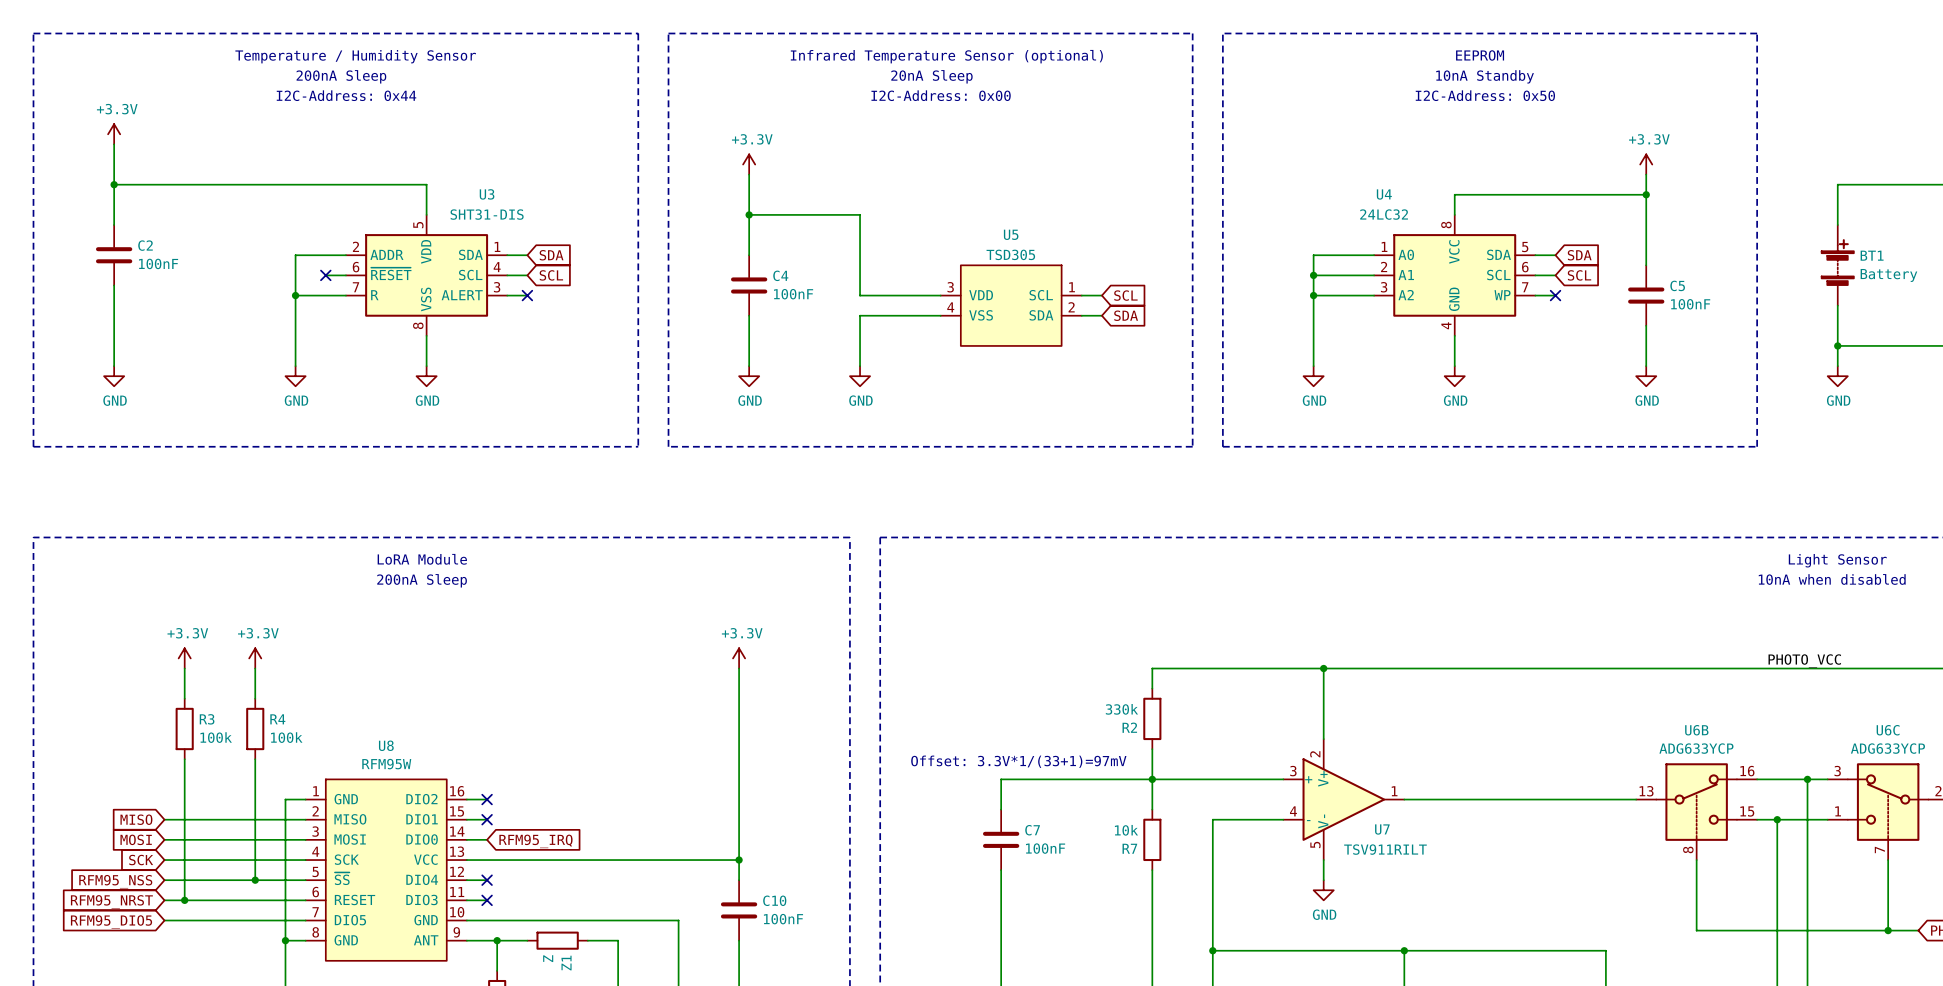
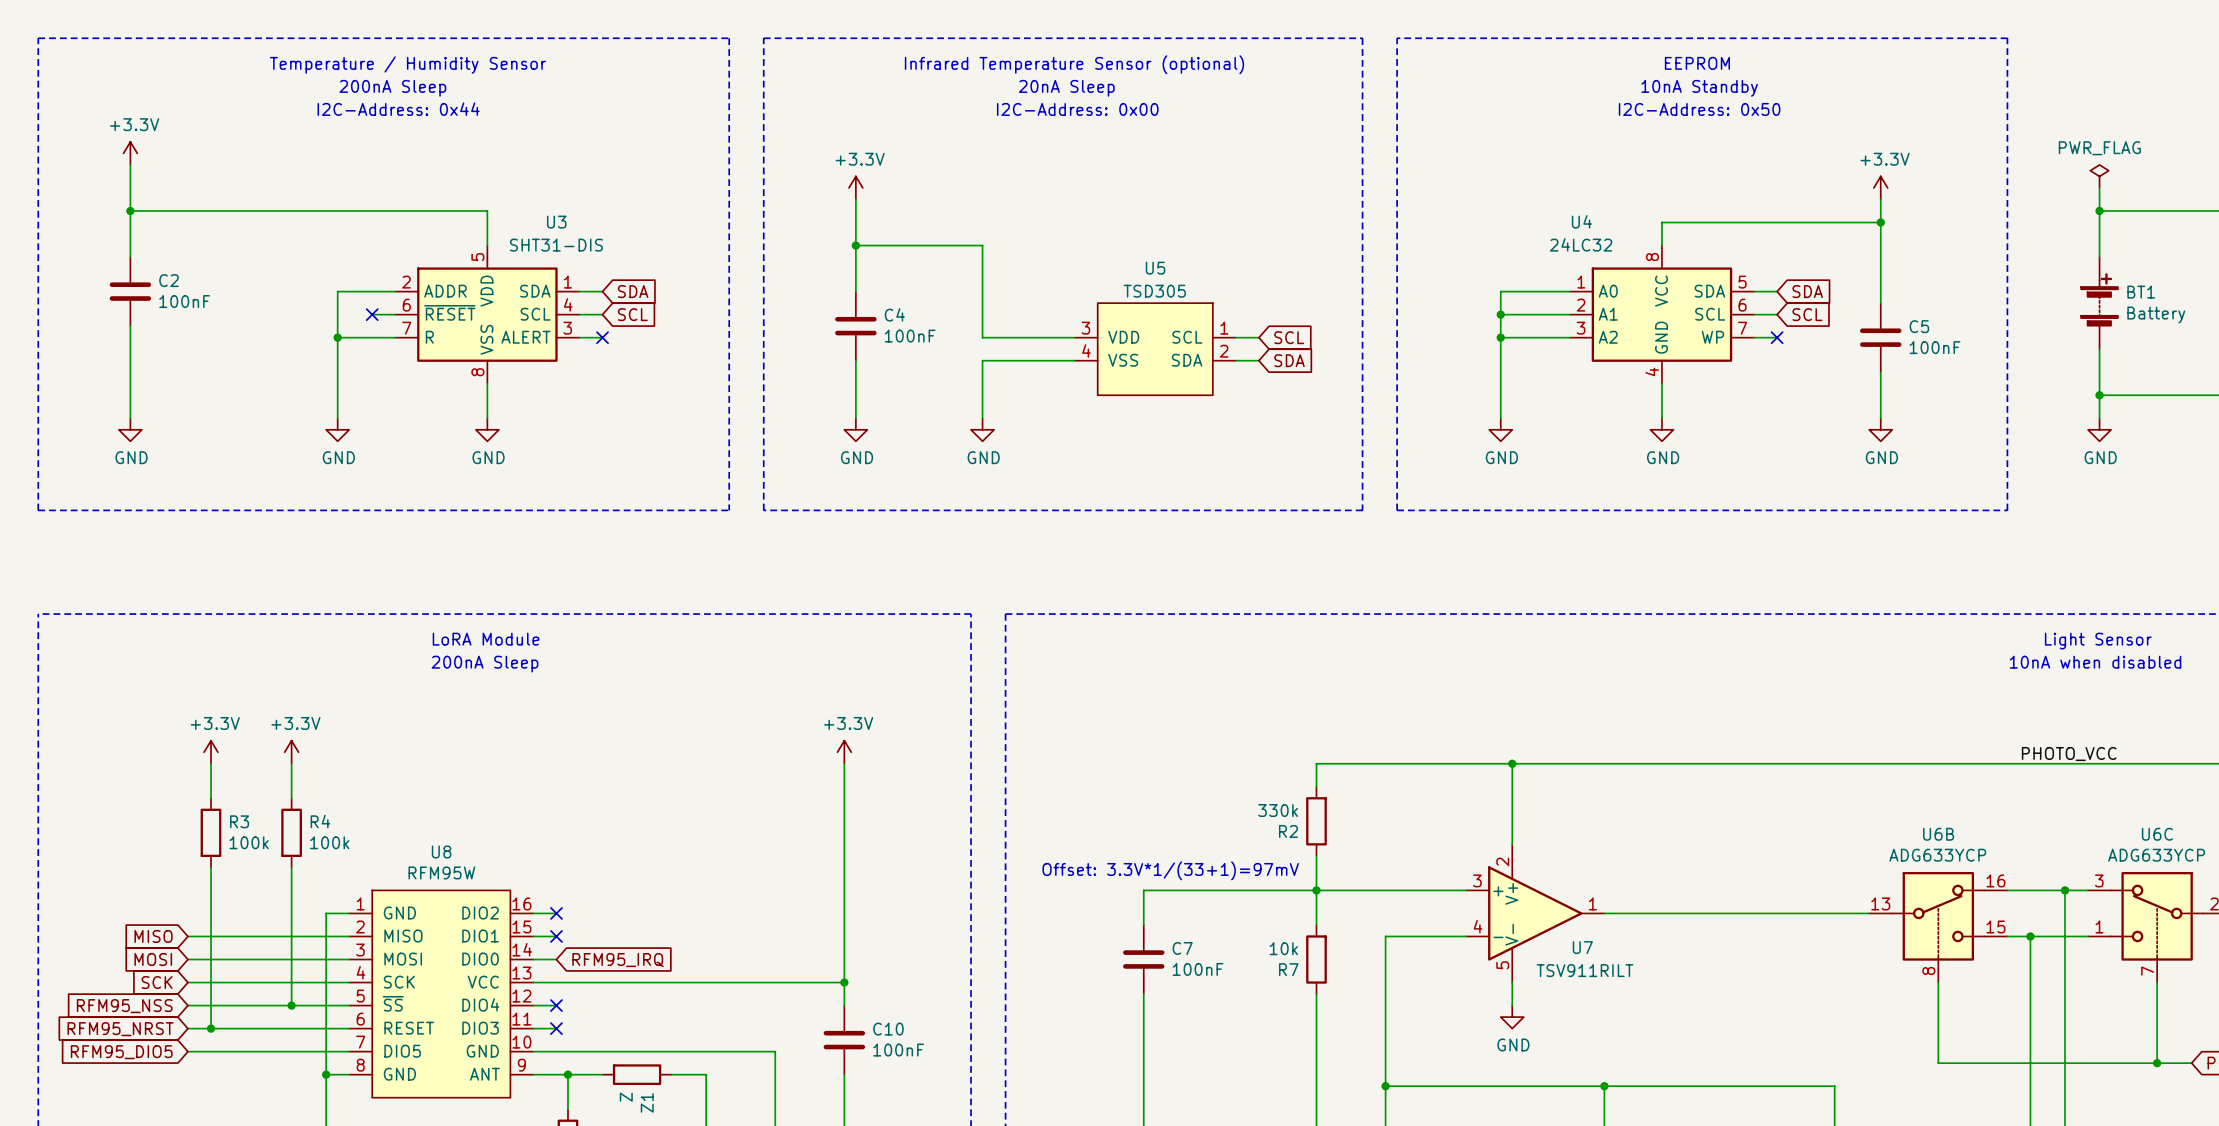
power symbol: none -> PWR_FLAG (2099, 176)
wire: none -> (2099, 187) (2099, 211)
junction: none -> (2099, 211)

